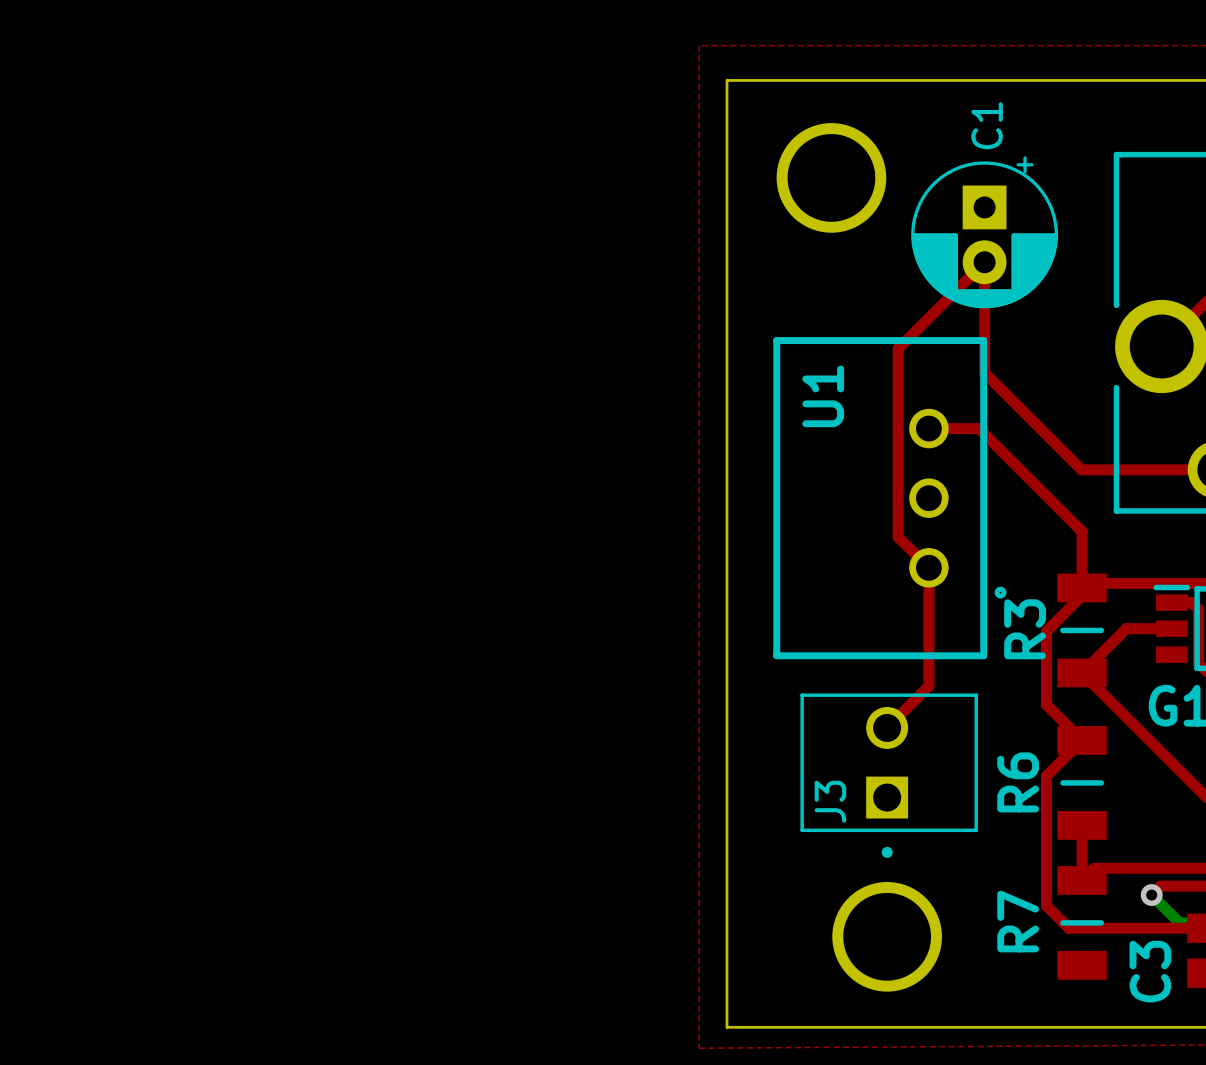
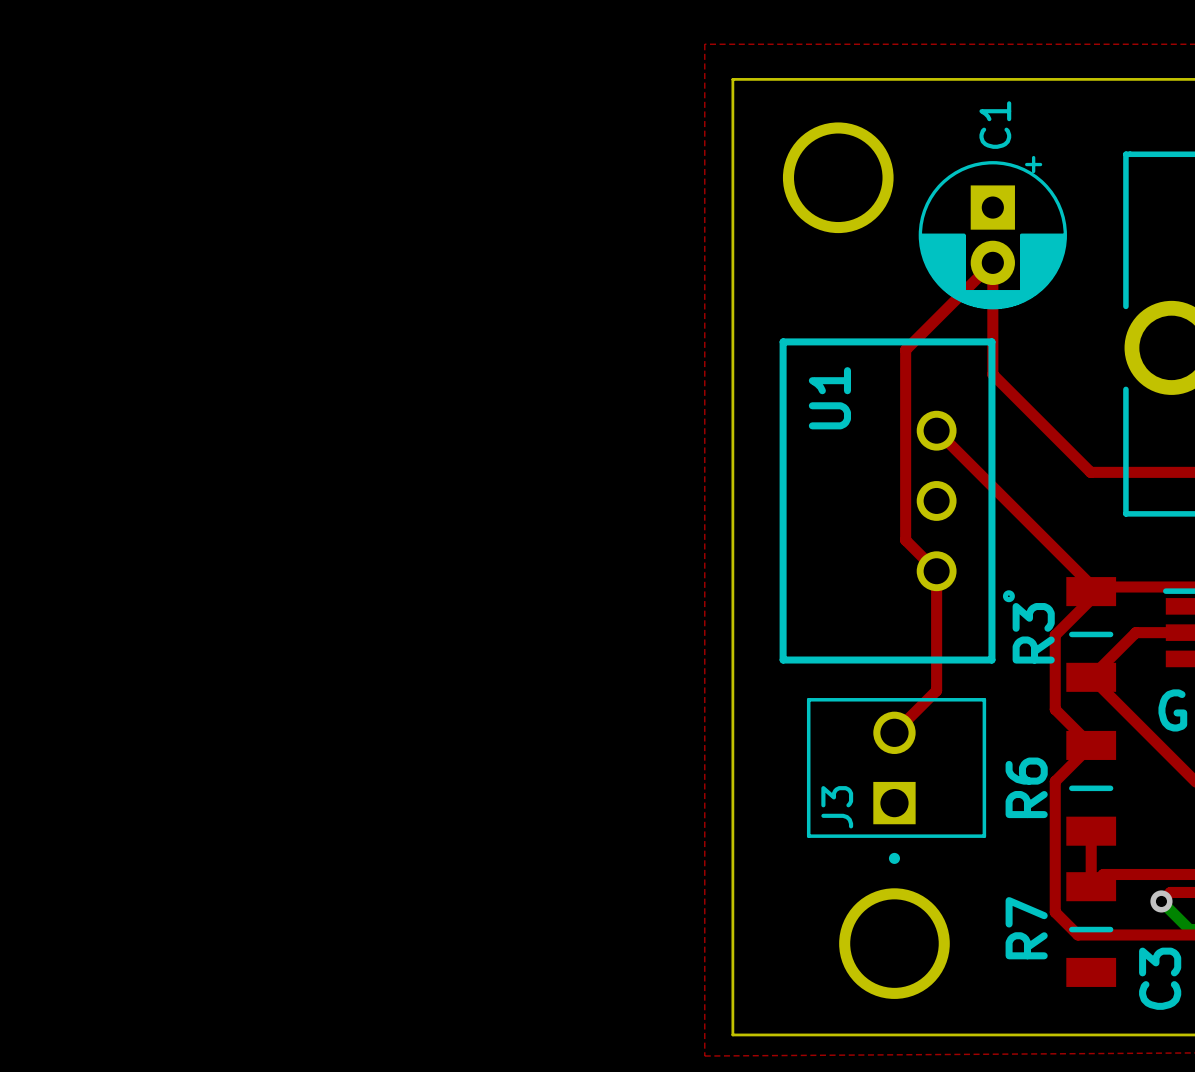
top track: (928, 428) (979, 428) (1082, 531) (1082, 581) -> (936, 430) (1091, 585)

